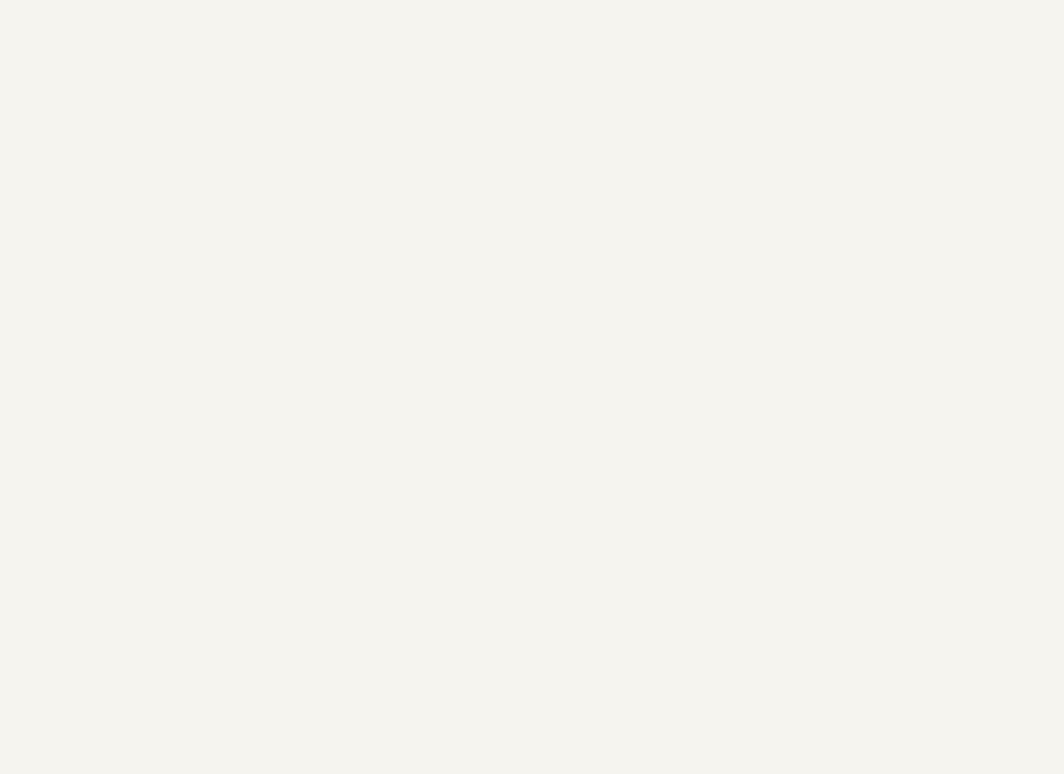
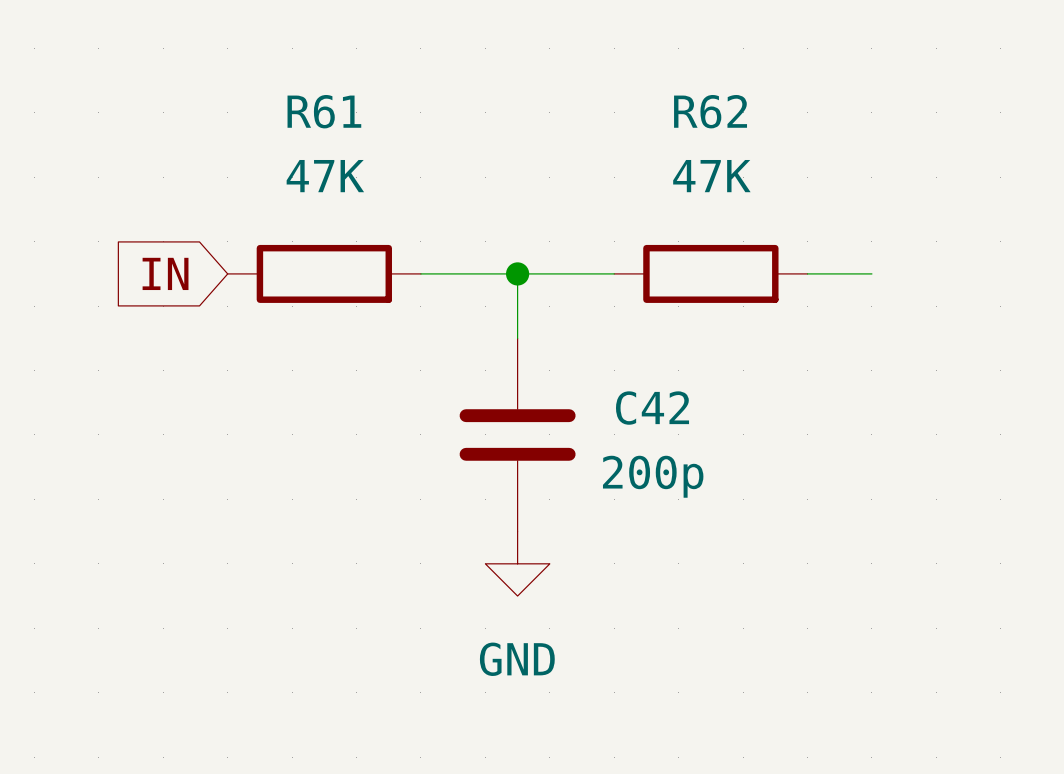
global label: none -> IN (165, 273)
R61: none -> 47K (324, 273)
wire: none -> (420, 273) (614, 273)
wire: none -> (517, 273) (517, 338)
junction: none -> (517, 273)
R62: none -> 47K (710, 273)
wire: none -> (807, 273) (871, 273)
C42: none -> 200p (517, 434)
power symbol: none -> GND (517, 563)

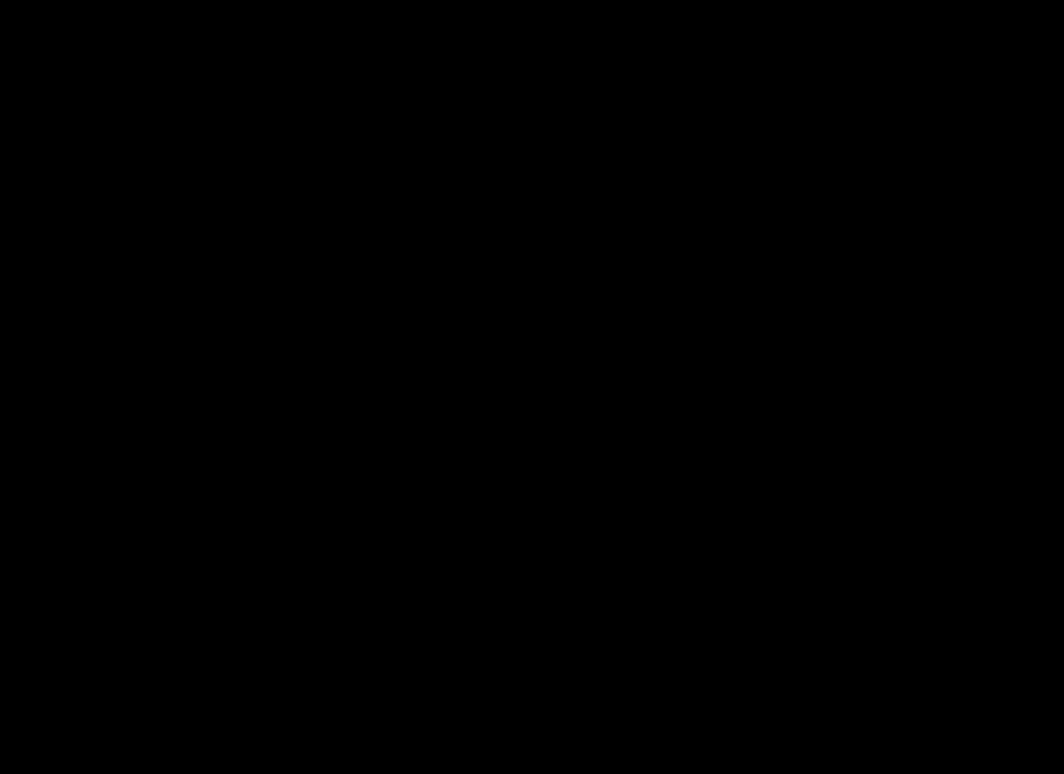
global label: IN (165, 273) -> none
R61: 47K (324, 273) -> none
wire: (420, 273) (614, 273) -> none
wire: (517, 273) (517, 338) -> none
junction: (517, 273) -> none
R62: 47K (710, 273) -> none
wire: (807, 273) (871, 273) -> none
C42: 200p (517, 434) -> none
power symbol: GND (517, 563) -> none

